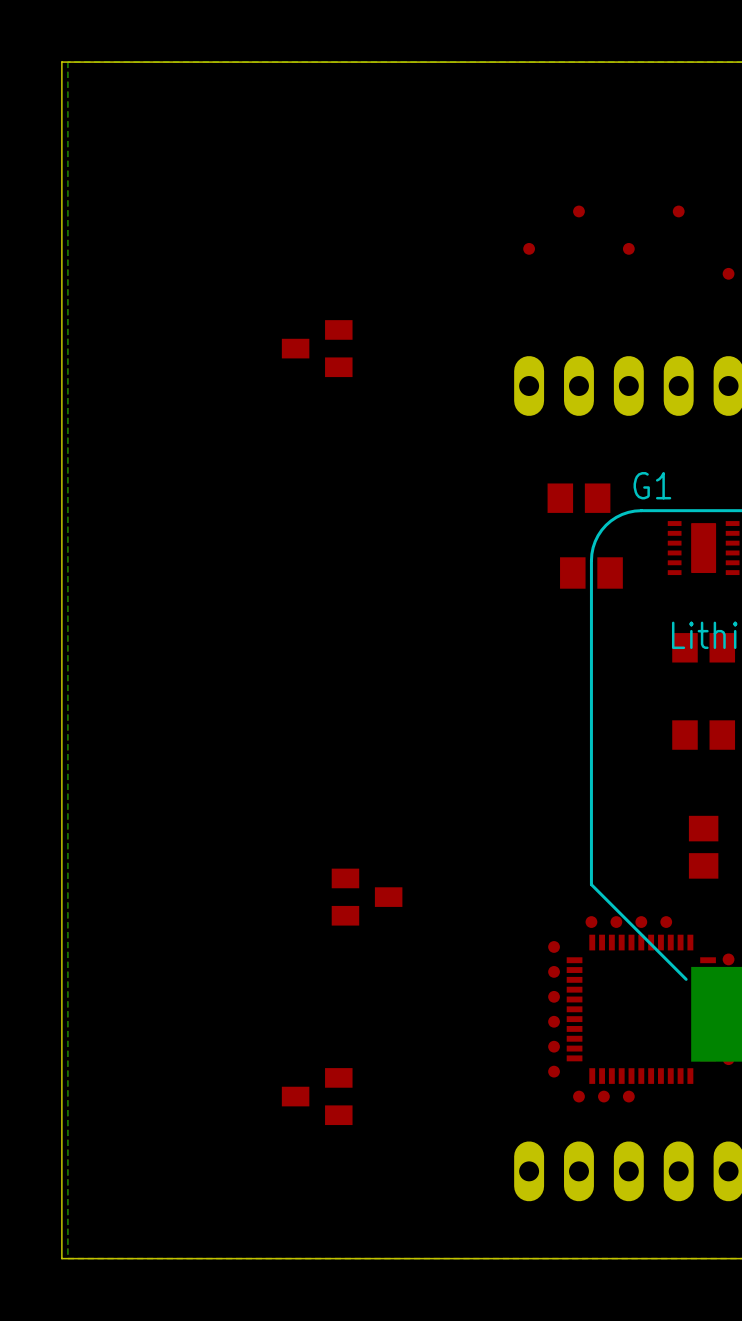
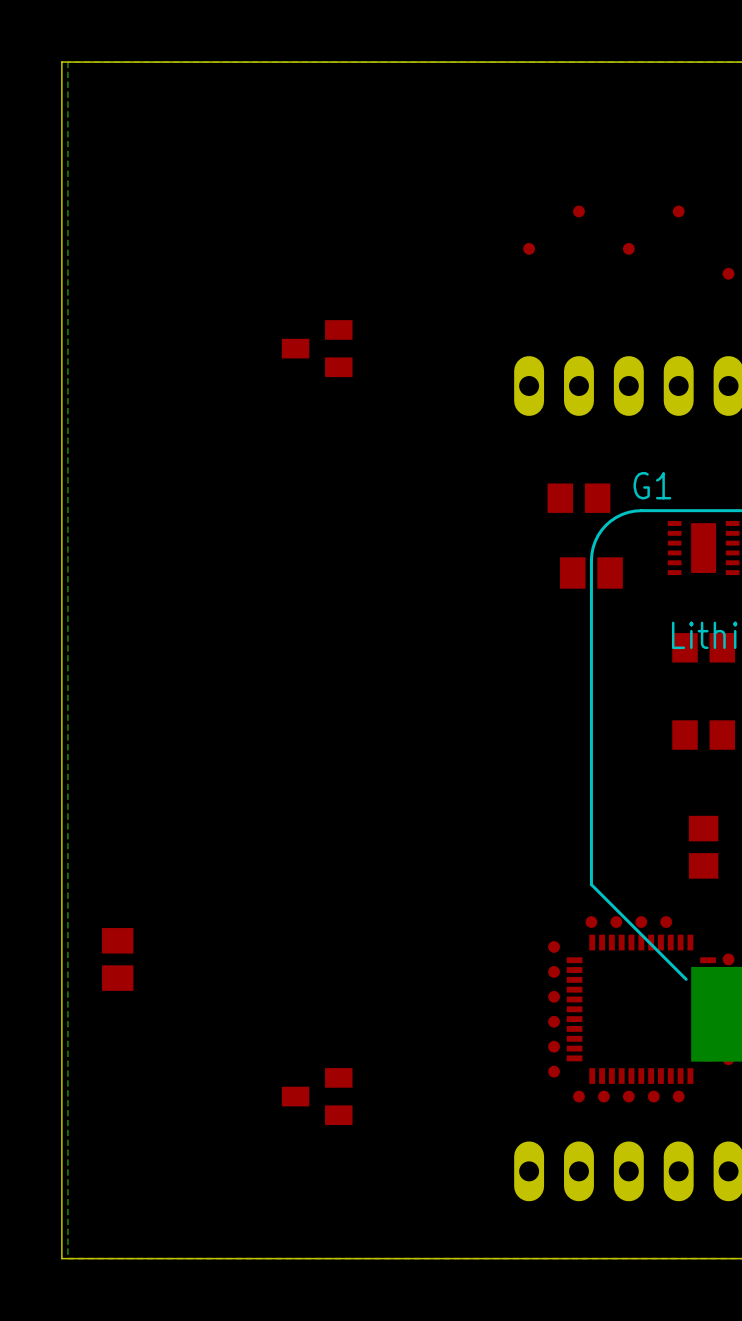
part: (367, 897) -> none
part: none -> (117, 959)
part: none -> (653, 1096)
part: none -> (678, 1096)

